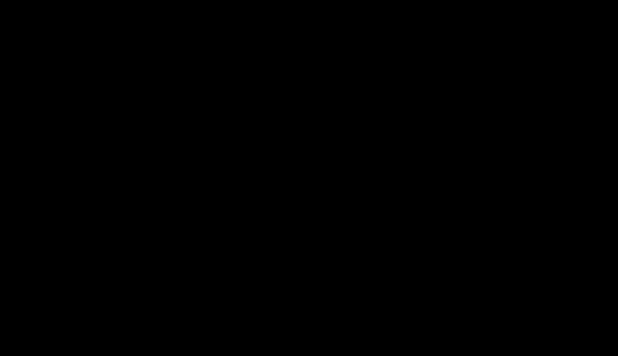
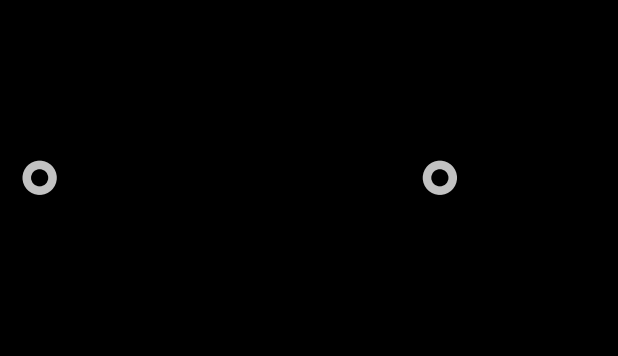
via: none -> (39, 177)
via: none -> (439, 177)

